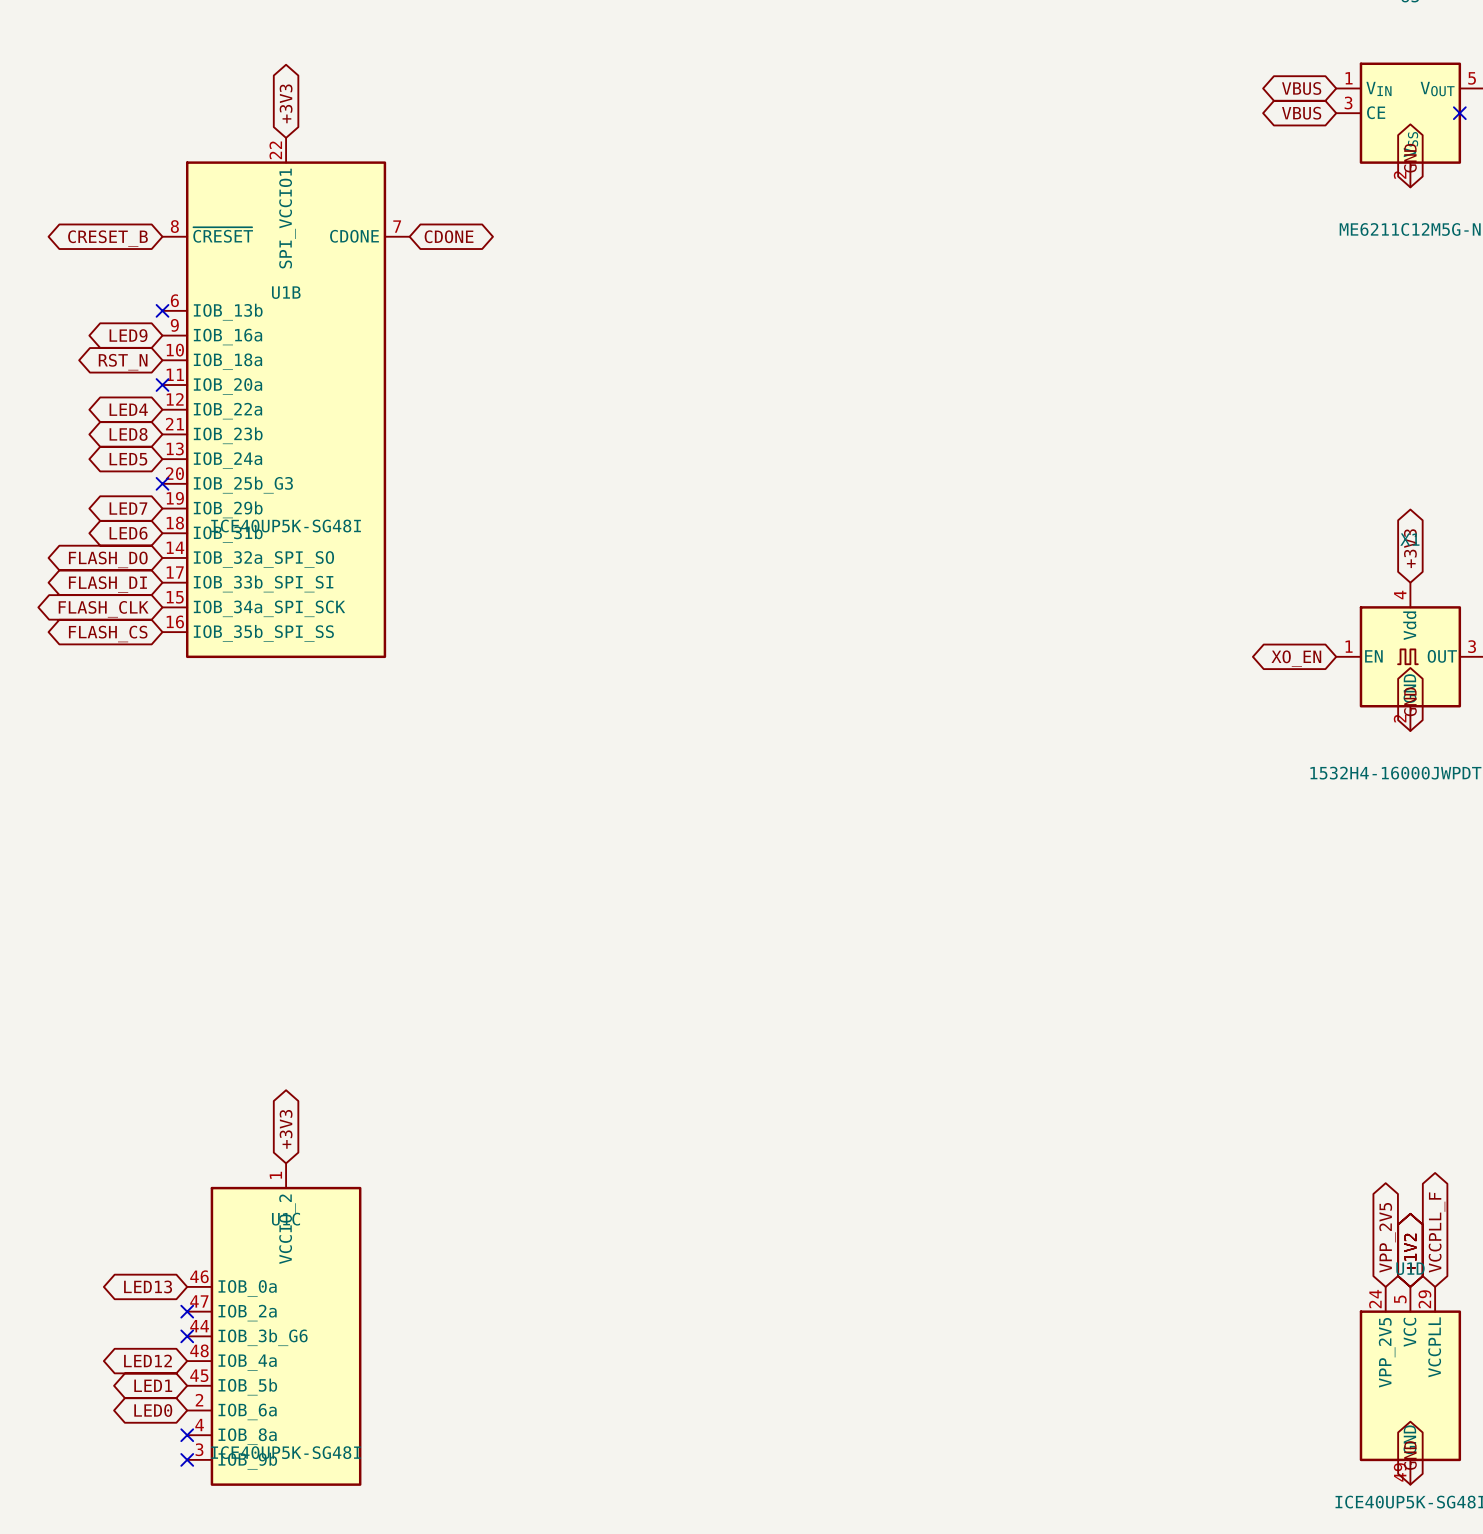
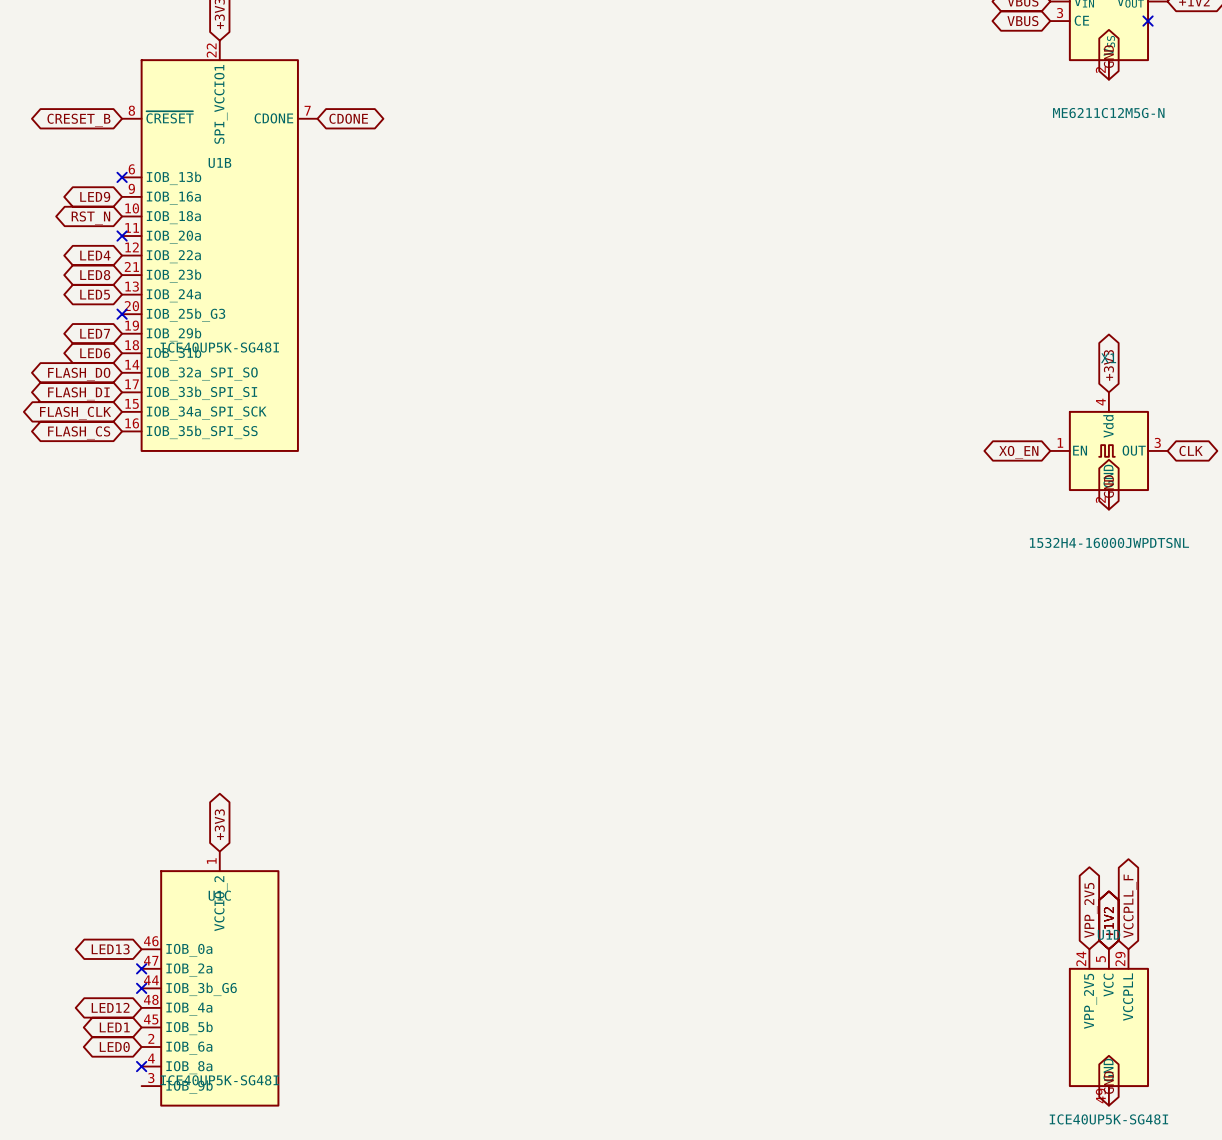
no-connect mark: (187, 1459) -> none

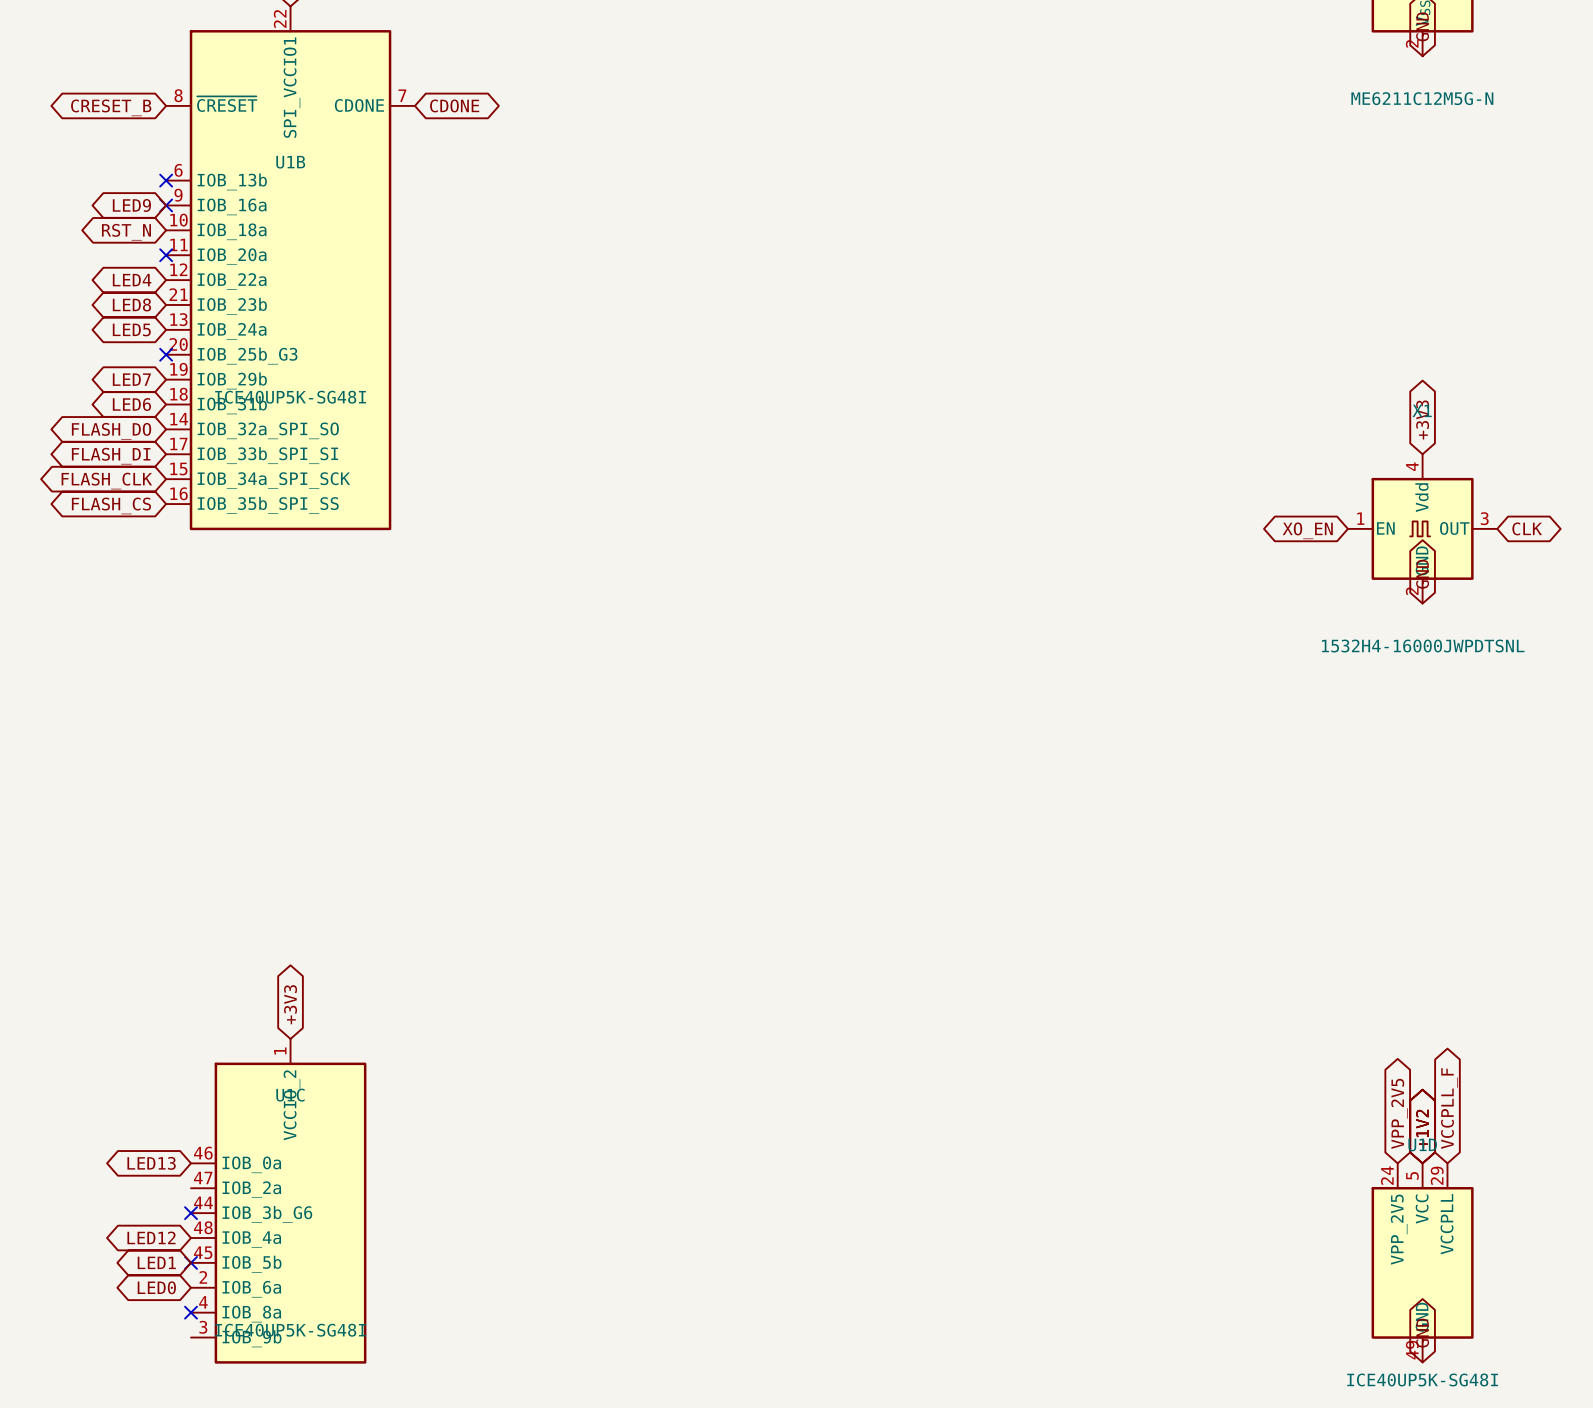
no-connect mark: none -> (166, 205)
no-connect mark: (141, 968) -> none
no-connect mark: none -> (191, 1262)

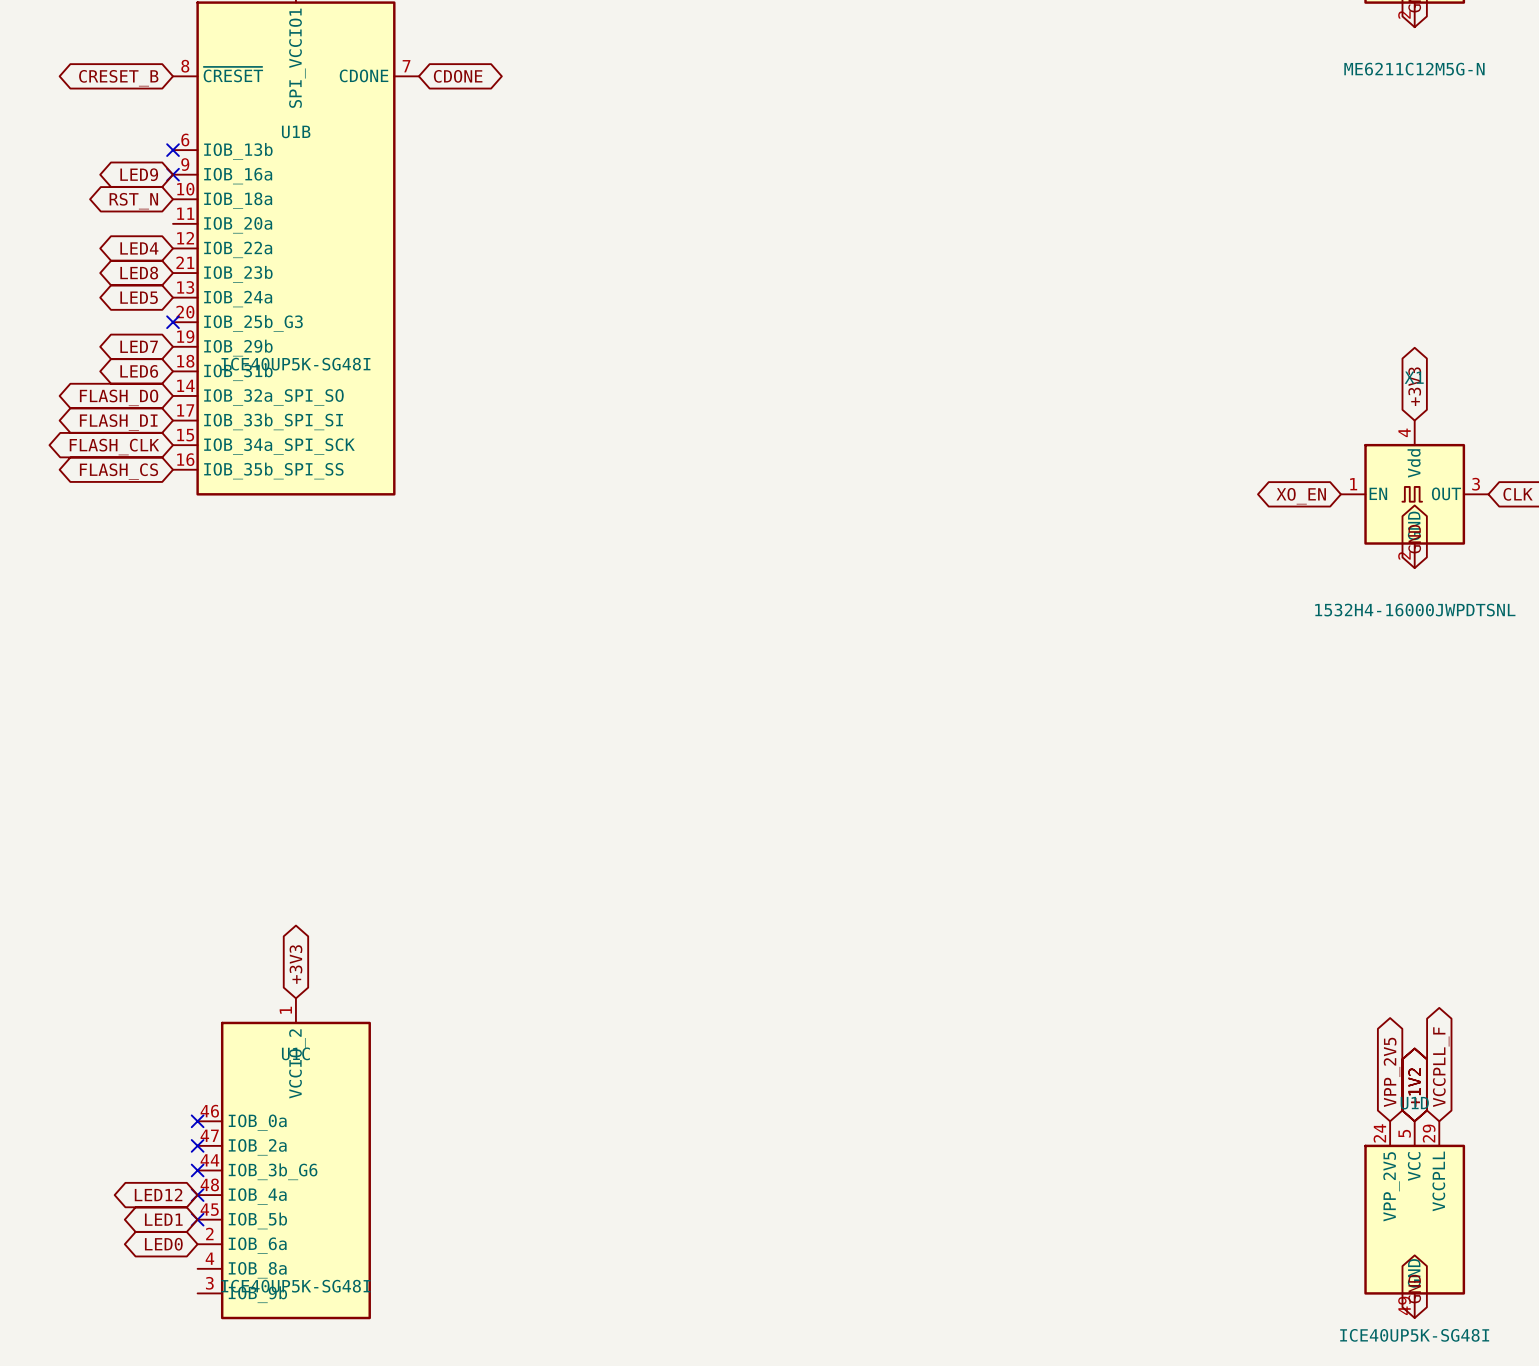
no-connect mark: (166, 255) -> none
global label: LED13 (151, 1163) -> none
no-connect mark: none -> (197, 1121)
no-connect mark: none -> (197, 1145)
no-connect mark: none -> (197, 1195)
no-connect mark: (191, 1312) -> none

